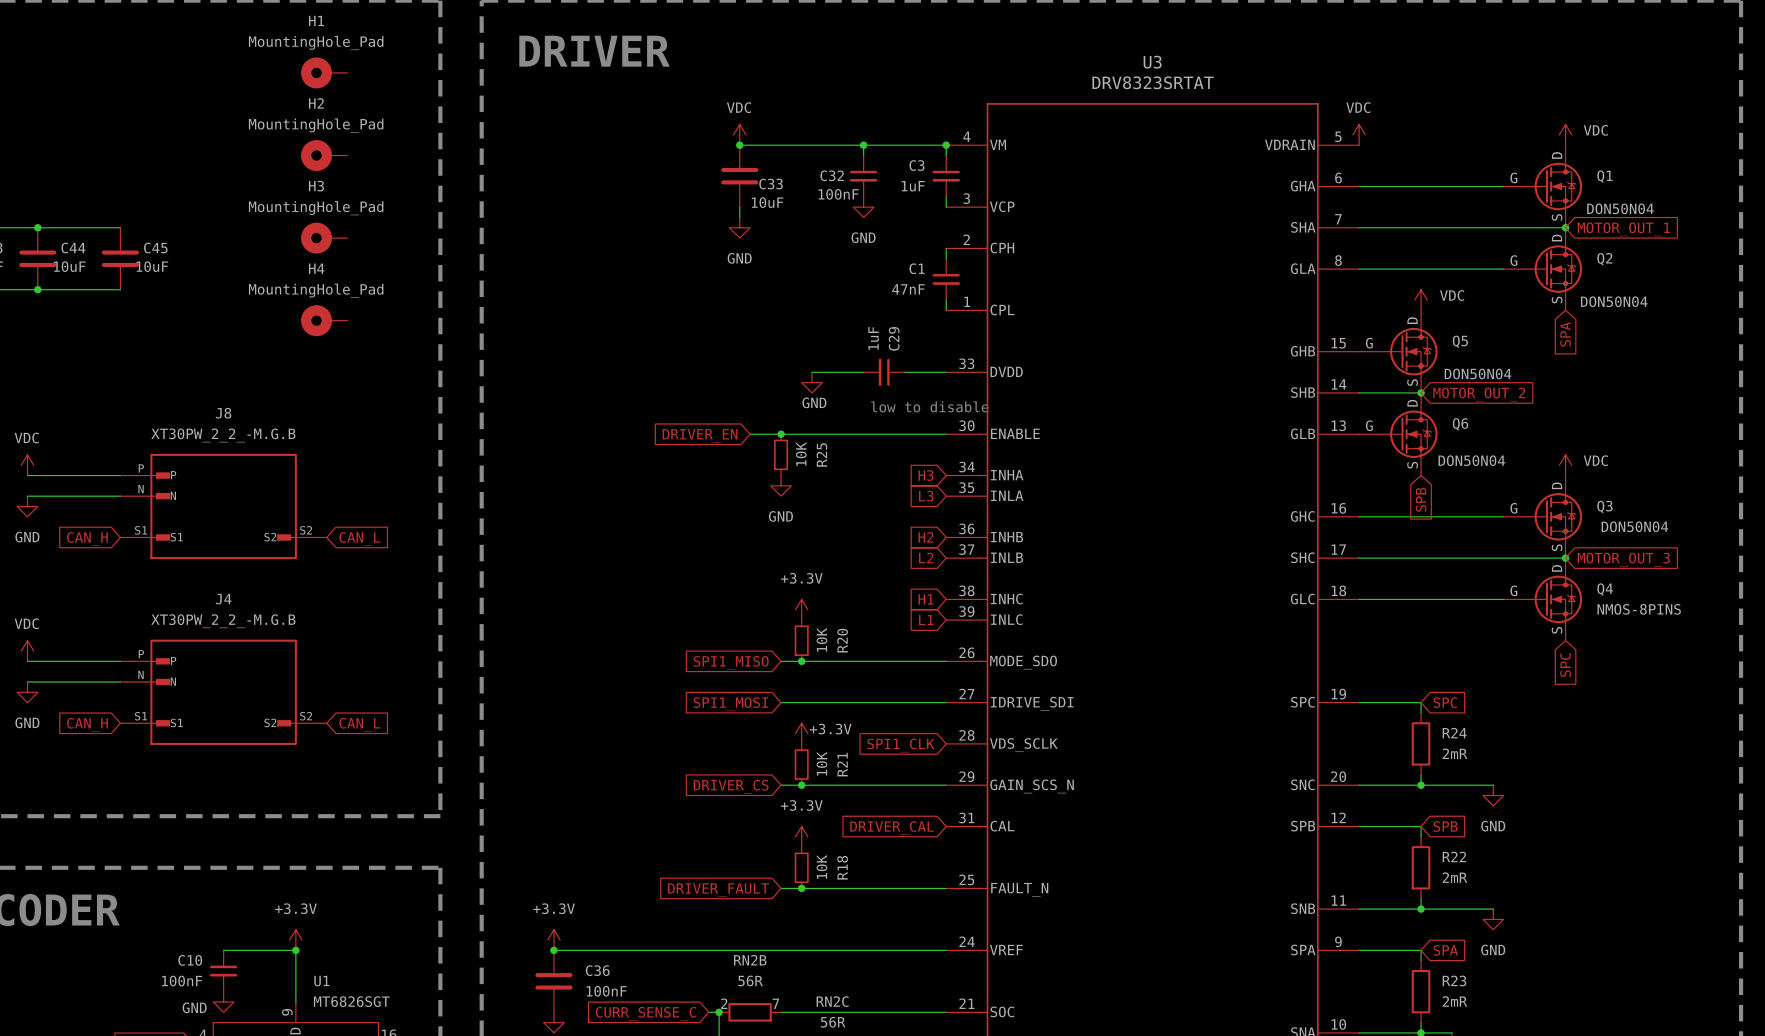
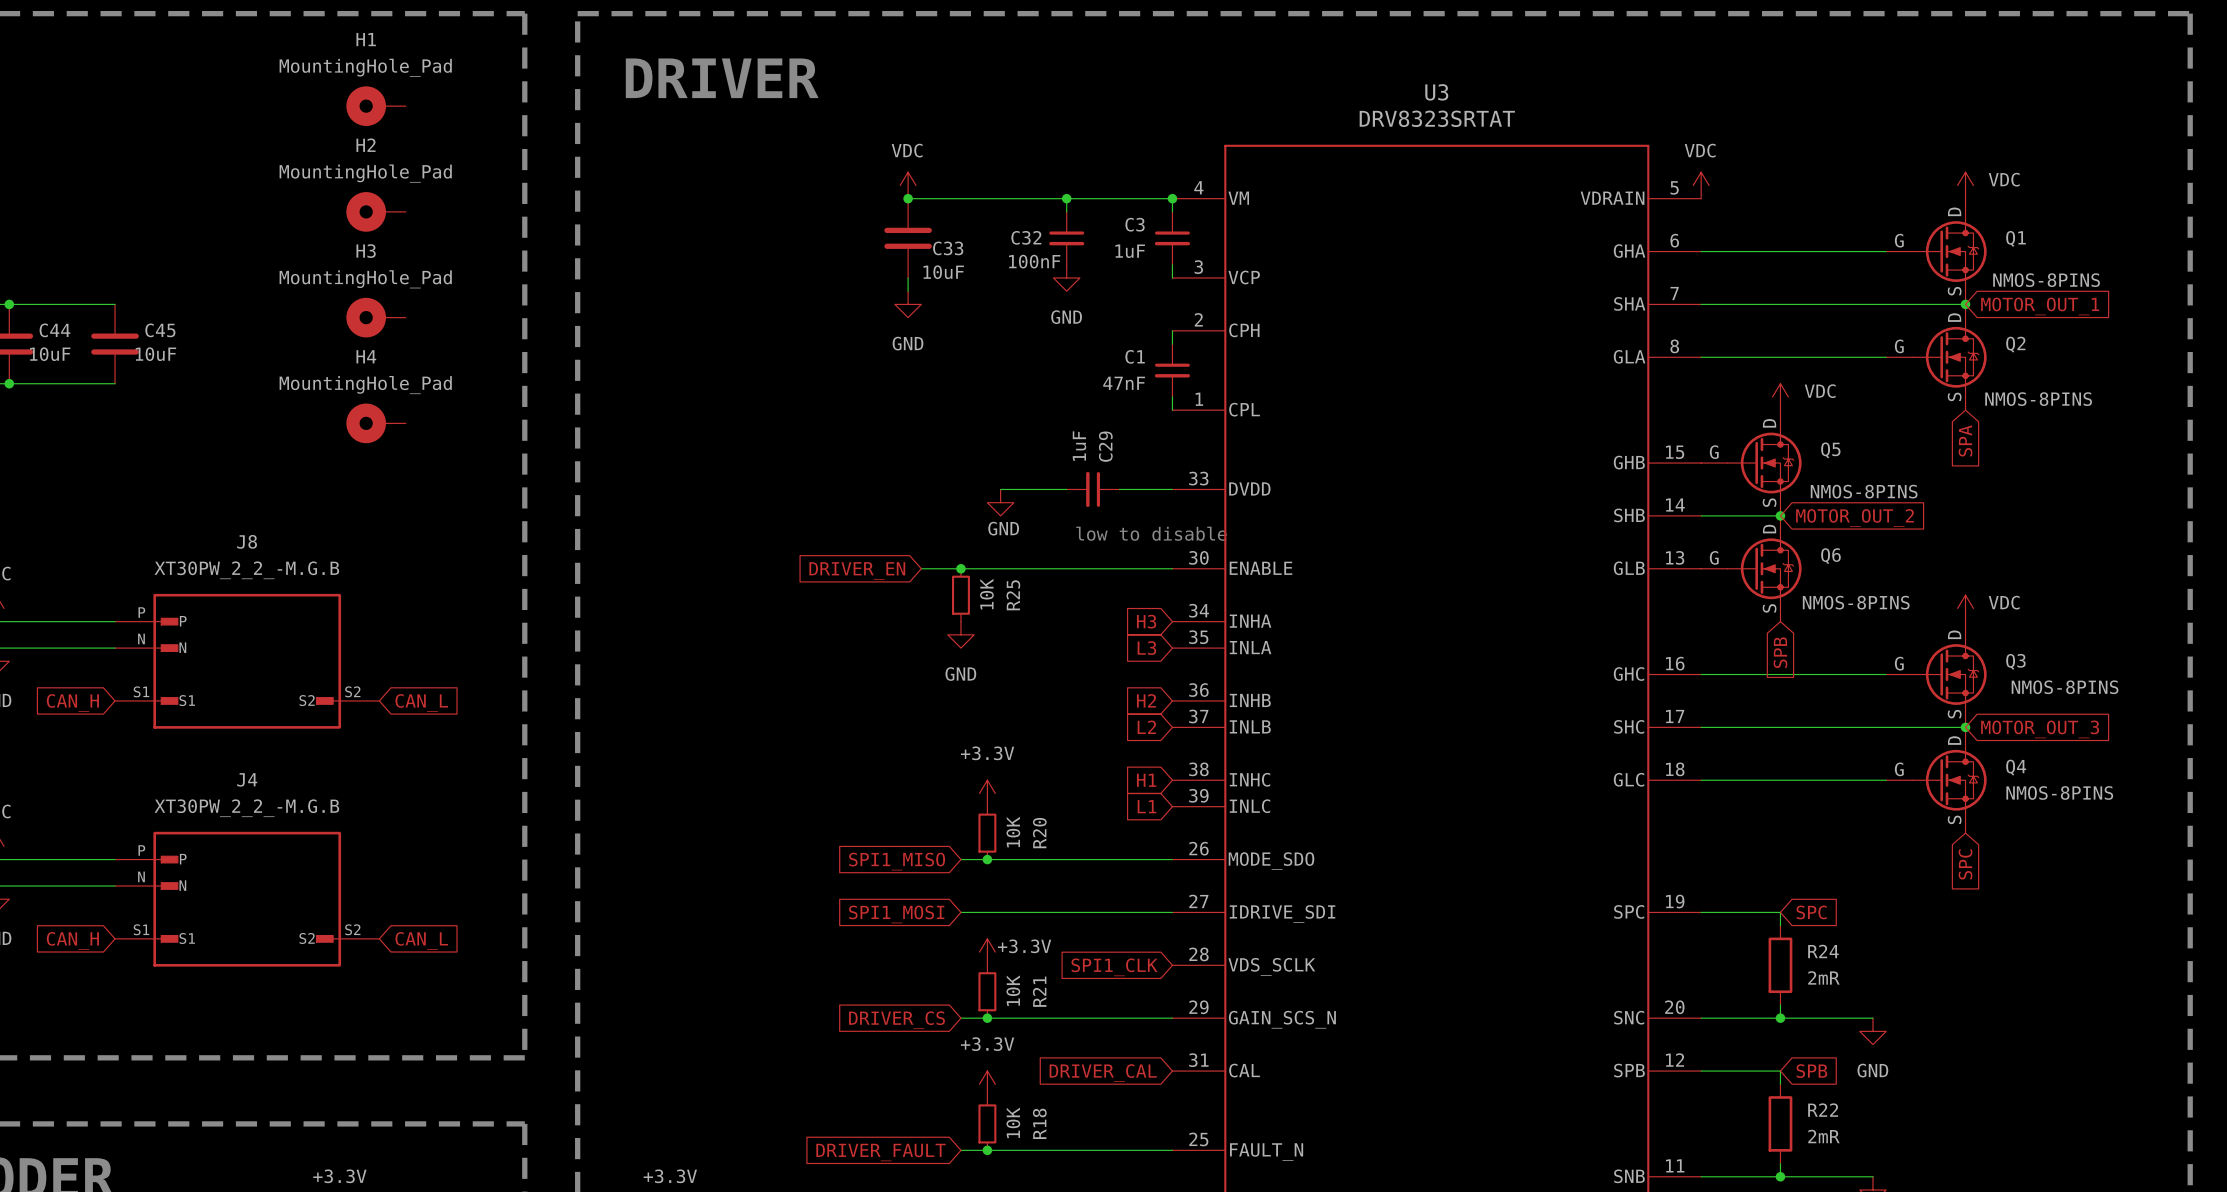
Q1 value: DON50N04 (1620, 208) -> NMOS-8PINS (2046, 280)
Q2 value: DON50N04 (1614, 301) -> NMOS-8PINS (2038, 399)
Q5 value: DON50N04 (1478, 373) -> NMOS-8PINS (1864, 491)
Q6 value: DON50N04 (1471, 460) -> NMOS-8PINS (1856, 602)
Q3 value: DON50N04 (1634, 526) -> NMOS-8PINS (2065, 687)

